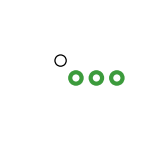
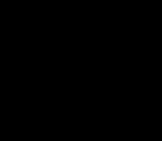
part: (89, 70) -> none

